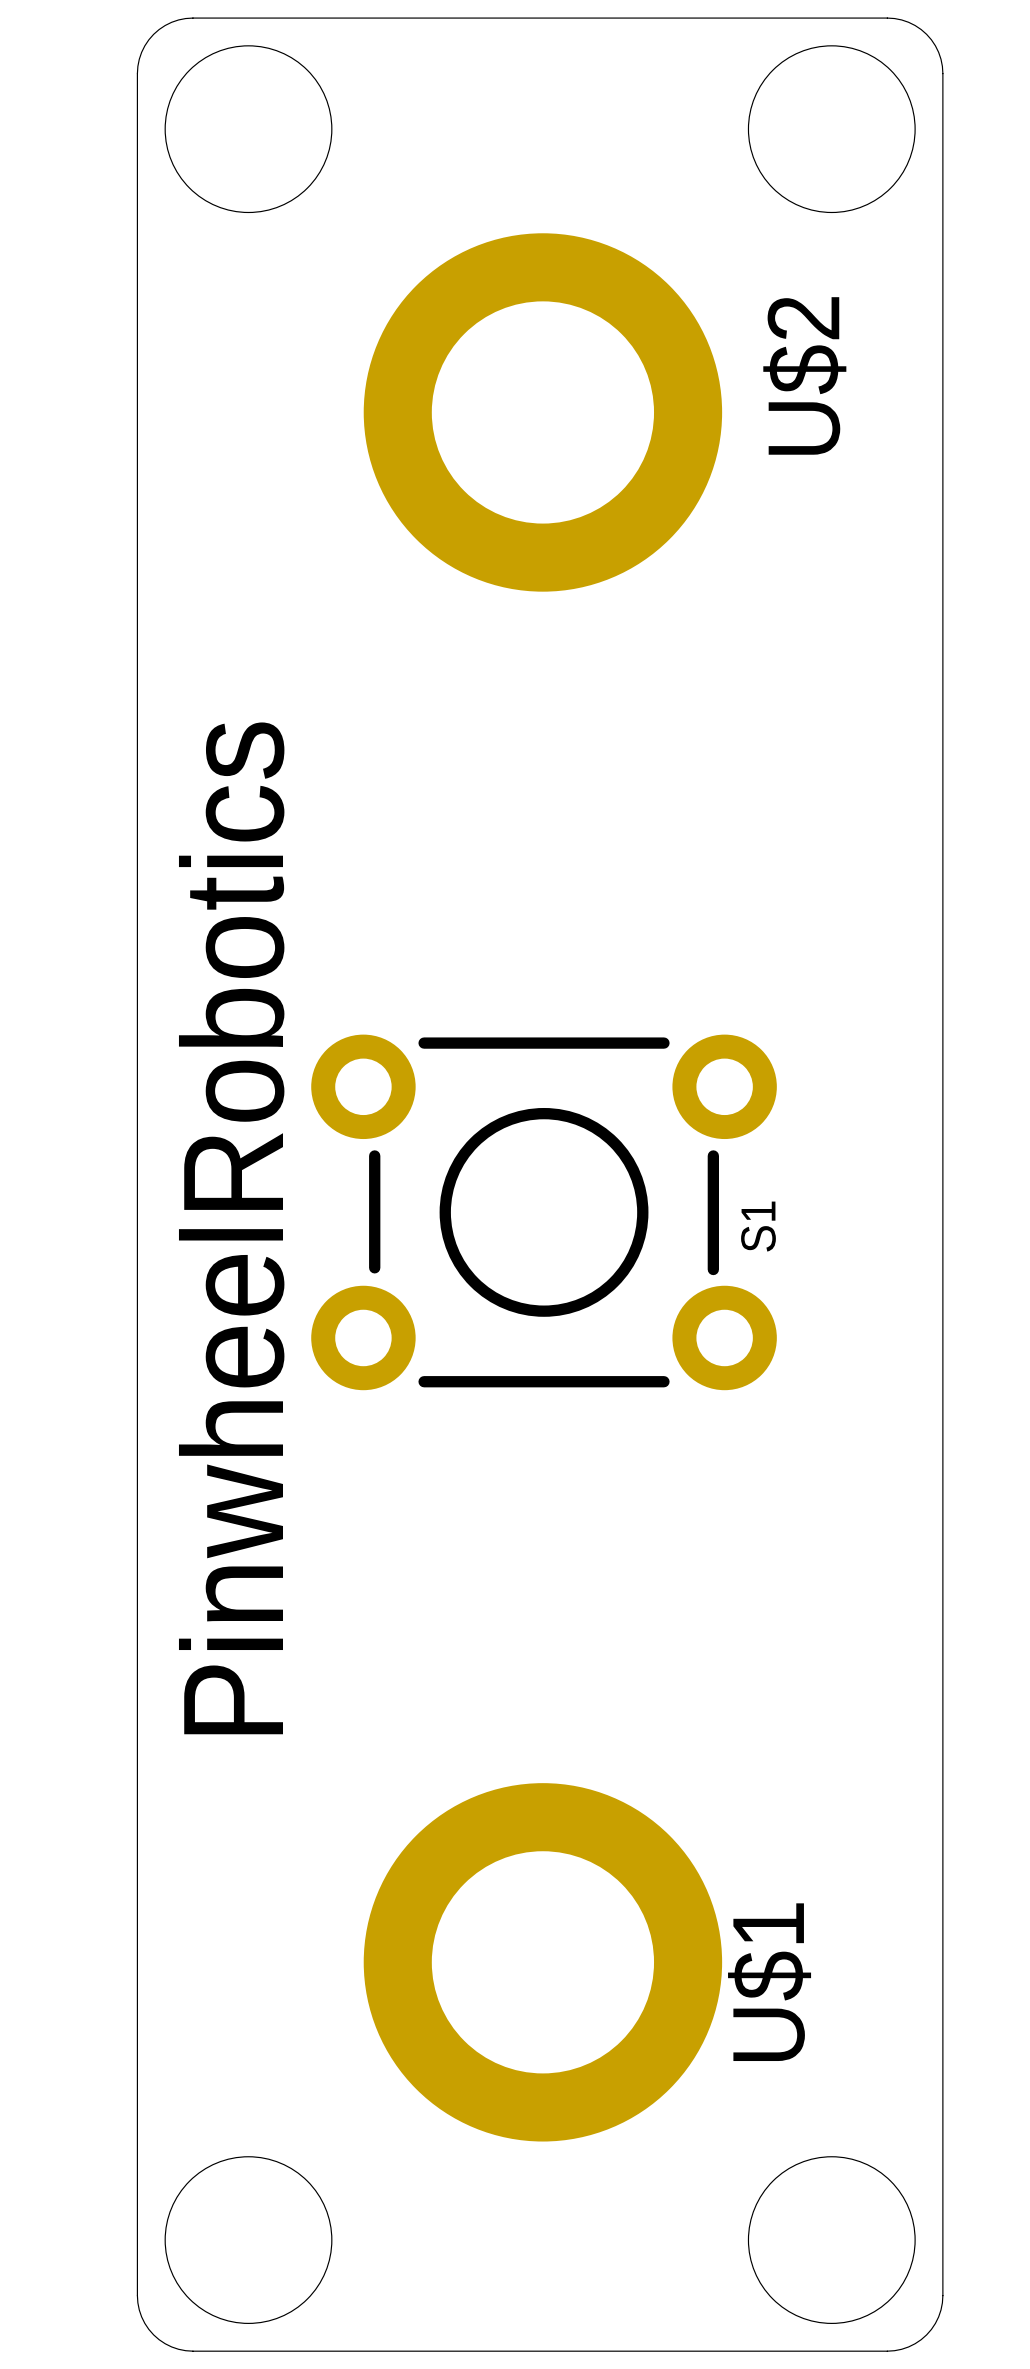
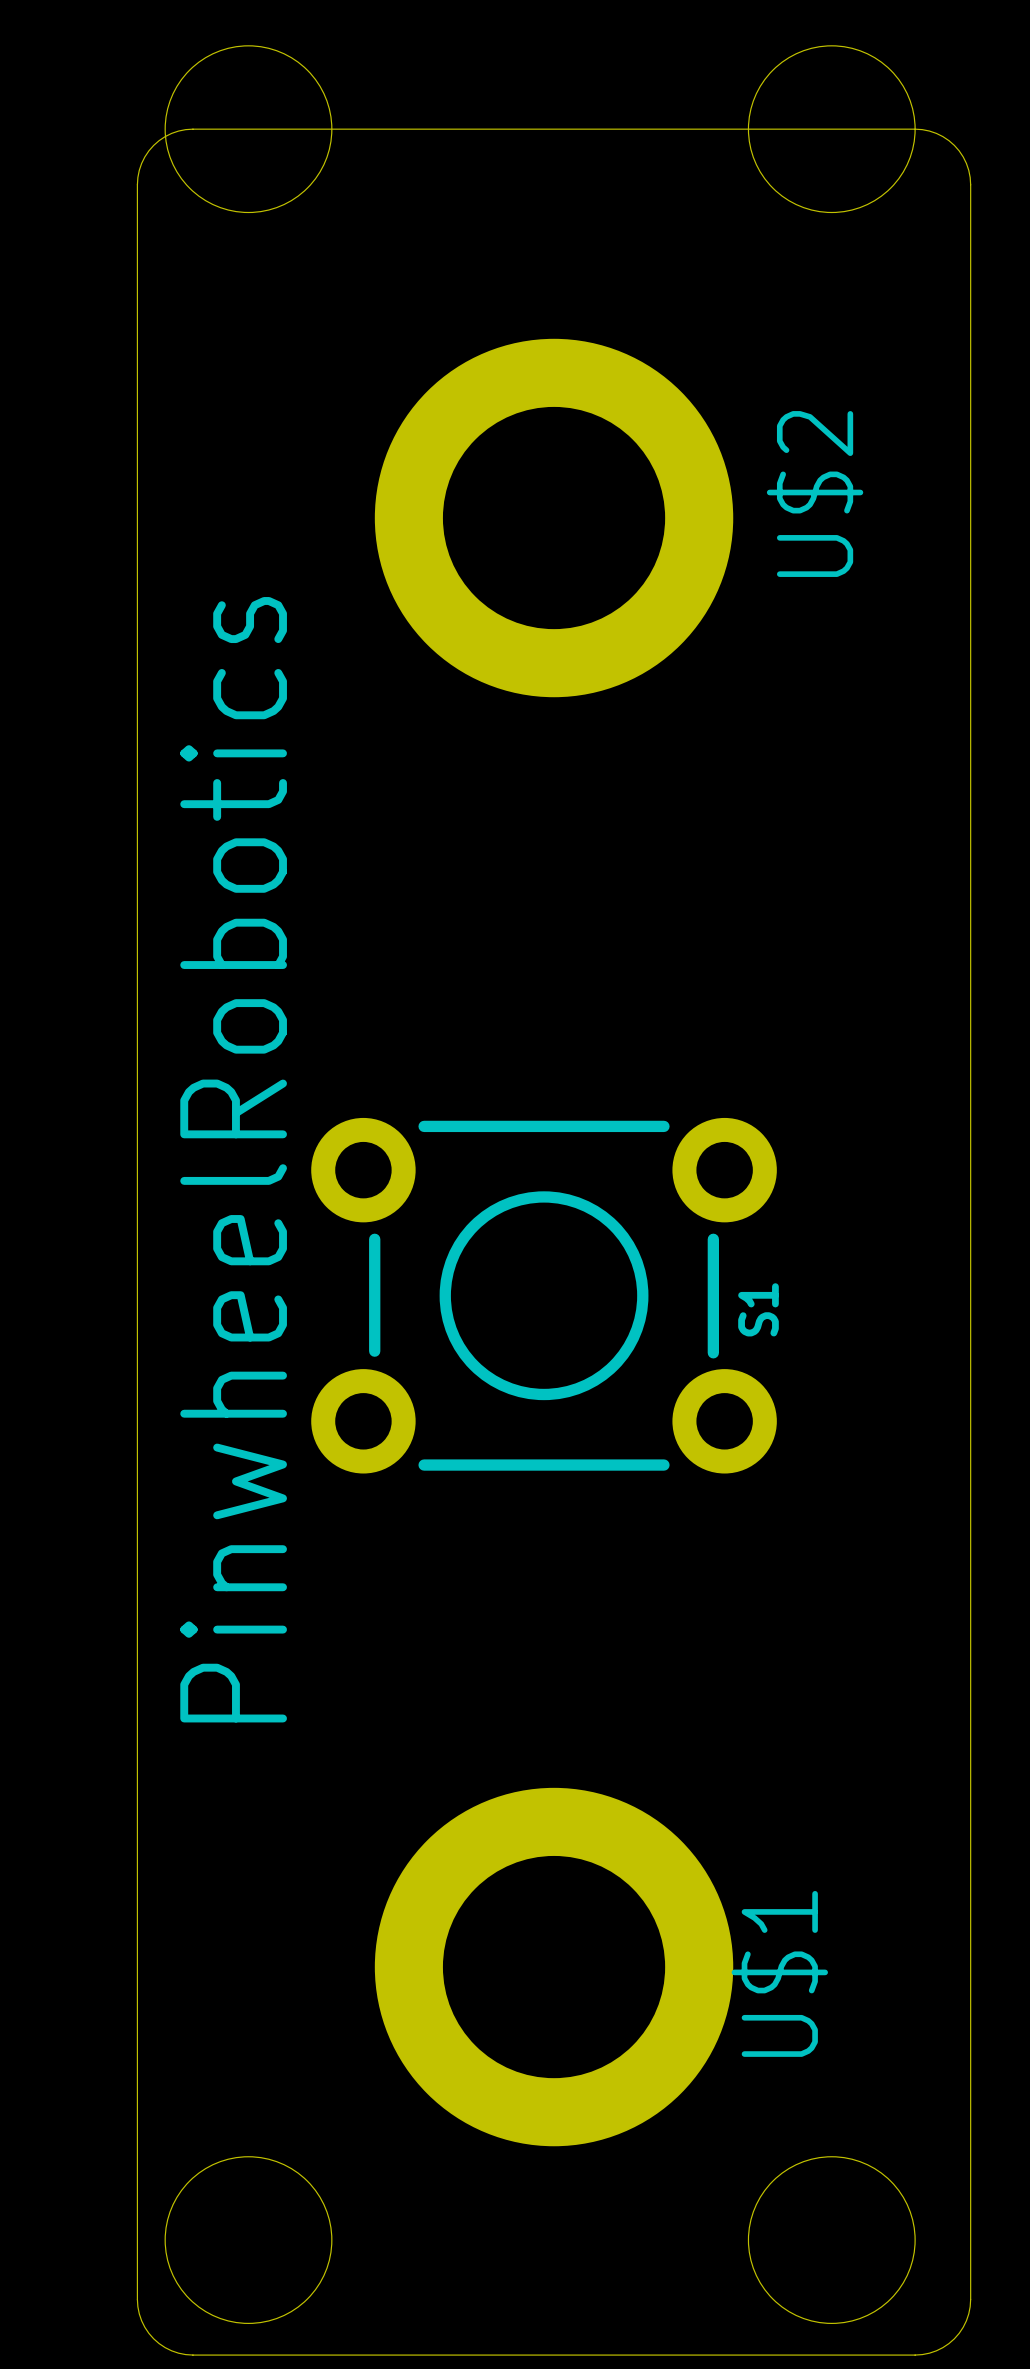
board edge: (137, 184) (137, 73) (139, 59) (148, 39) (159, 29) (171, 22) (185, 18) (887, 18) (908, 22) (921, 29) (935, 45) (942, 66) (942, 2295) (938, 2316) (931, 2329) (921, 2339) (908, 2346) (887, 2351) (192, 2351) (171, 2346) (153, 2334) (141, 2316) (137, 2295) -> (137, 184) (141, 163) (153, 145) (171, 133) (192, 129) (915, 129) (936, 133) (948, 140) (959, 150) (966, 163) (970, 184) (970, 2299) (966, 2320) (959, 2333) (942, 2347) (922, 2354) (192, 2355) (171, 2350) (153, 2338) (141, 2320) (137, 2295)
U$2 position: (542, 412) -> (554, 518)
S1 position: (544, 1212) -> (544, 1295)
U$1 position: (542, 1962) -> (554, 1967)

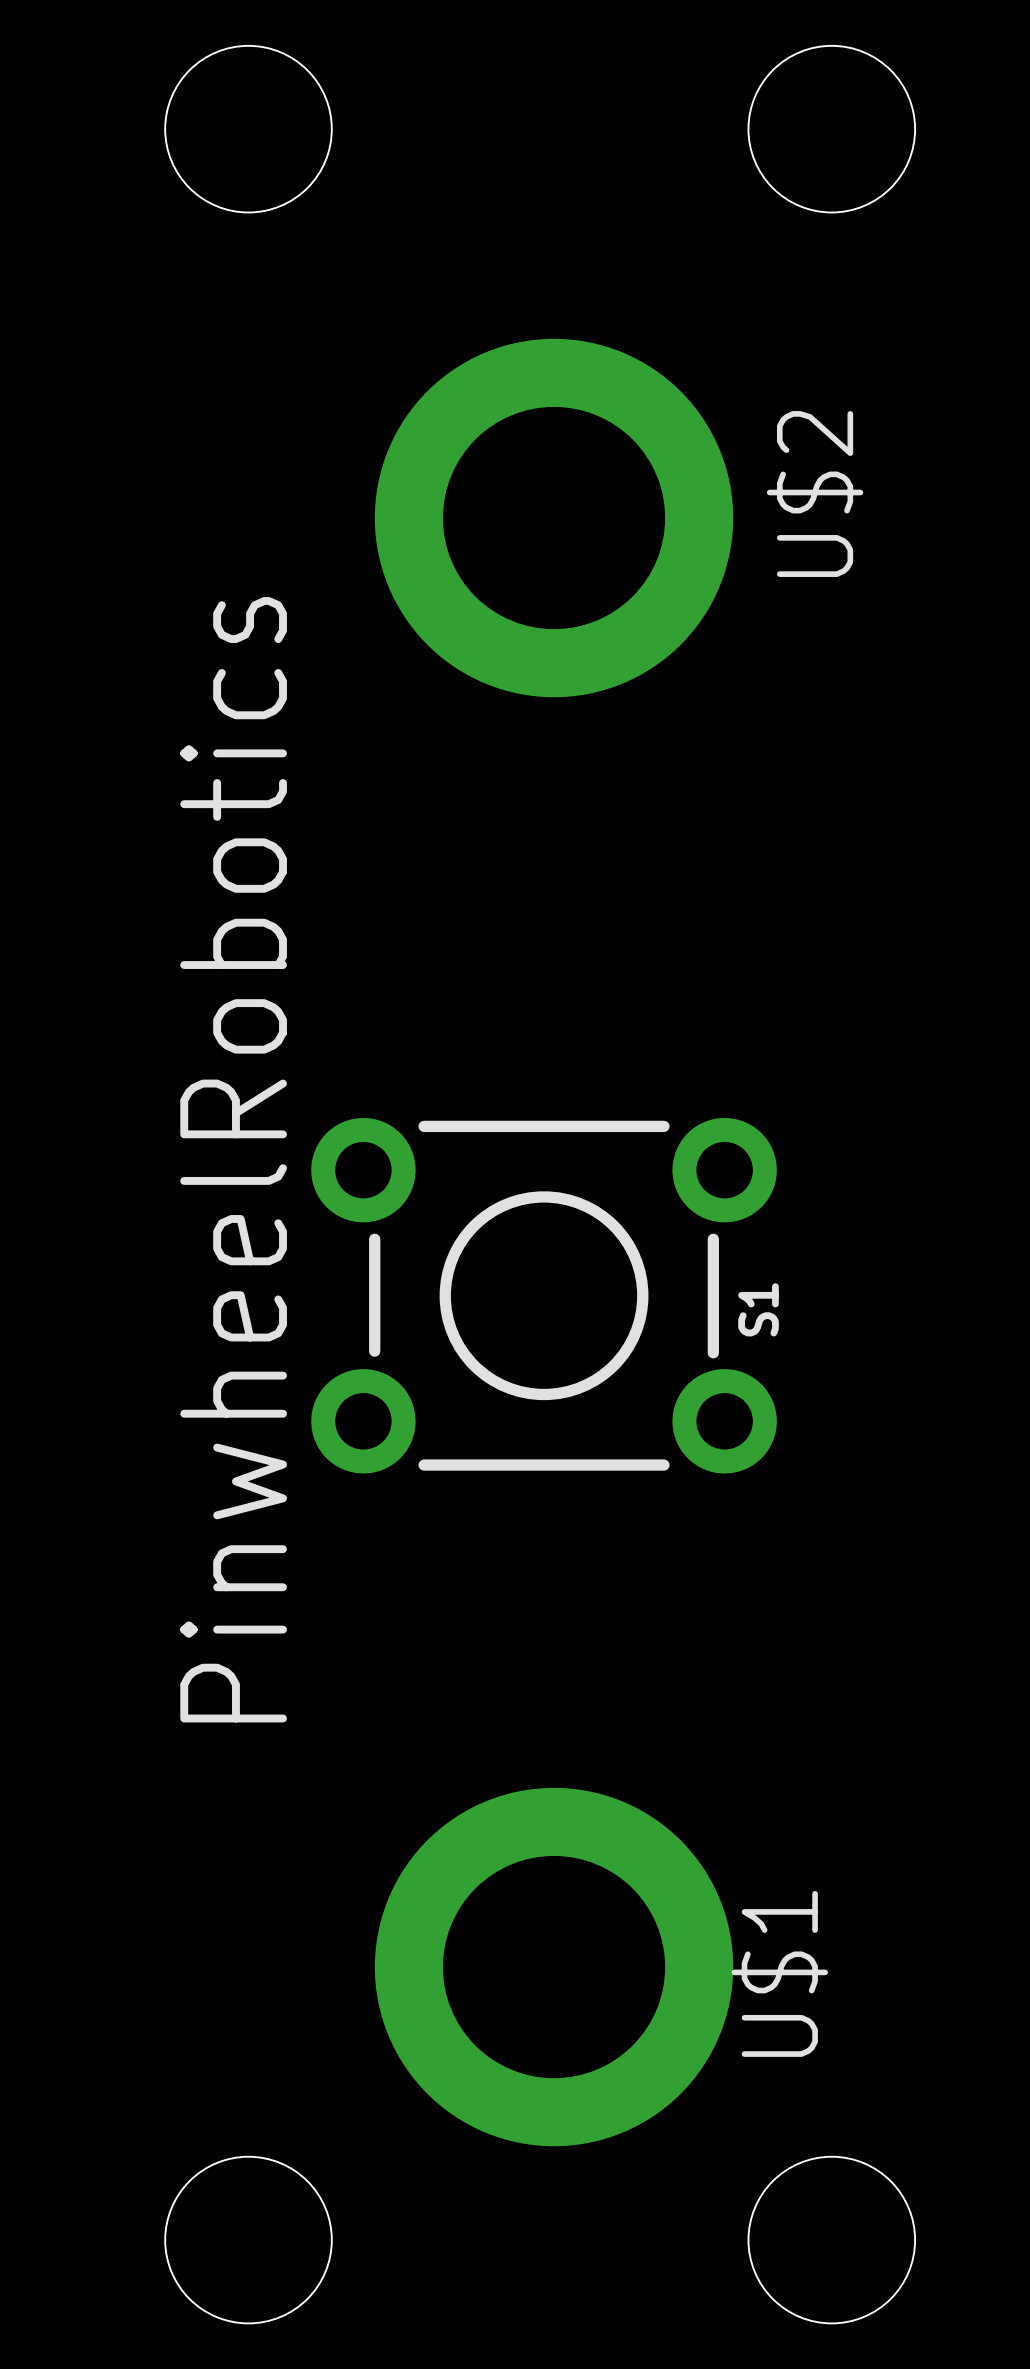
board edge: (192, 129) (915, 129) (936, 133) (948, 140) (959, 150) (968, 170) (970, 184) (970, 2299) (966, 2320) (959, 2333) (948, 2343) (929, 2353) (915, 2355) (192, 2355) (171, 2350) (159, 2343) (148, 2333) (139, 2313) (137, 2299) (137, 184) (141, 163) (153, 145) (171, 133) (192, 129) -> none

